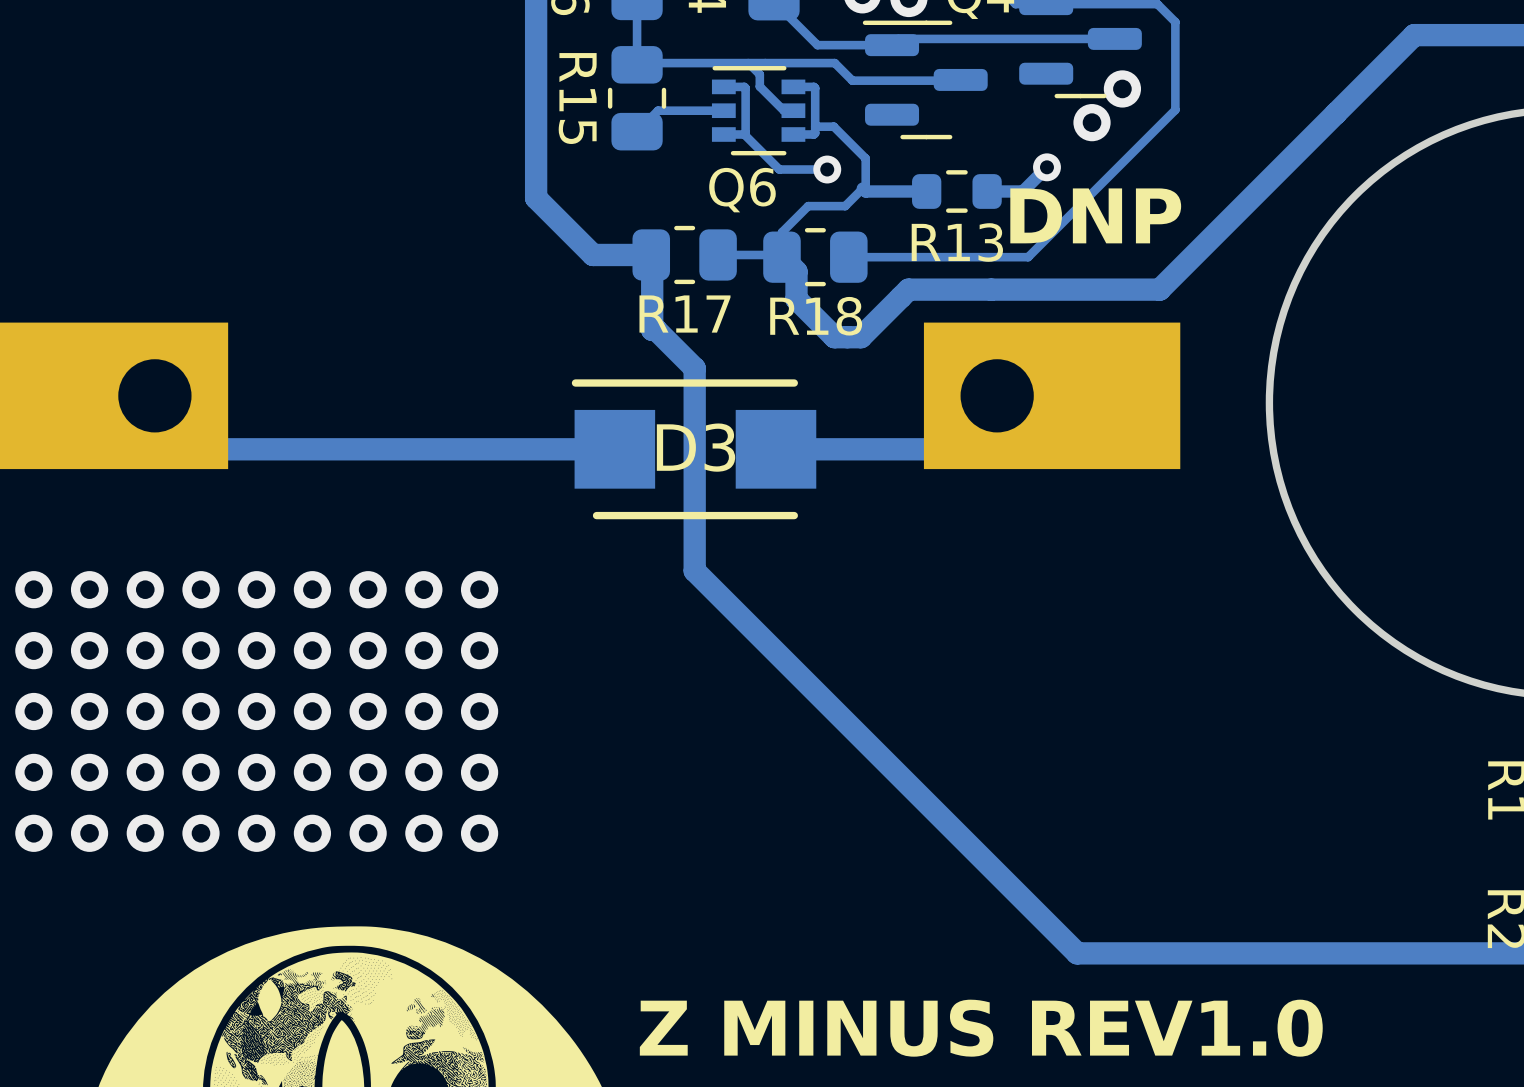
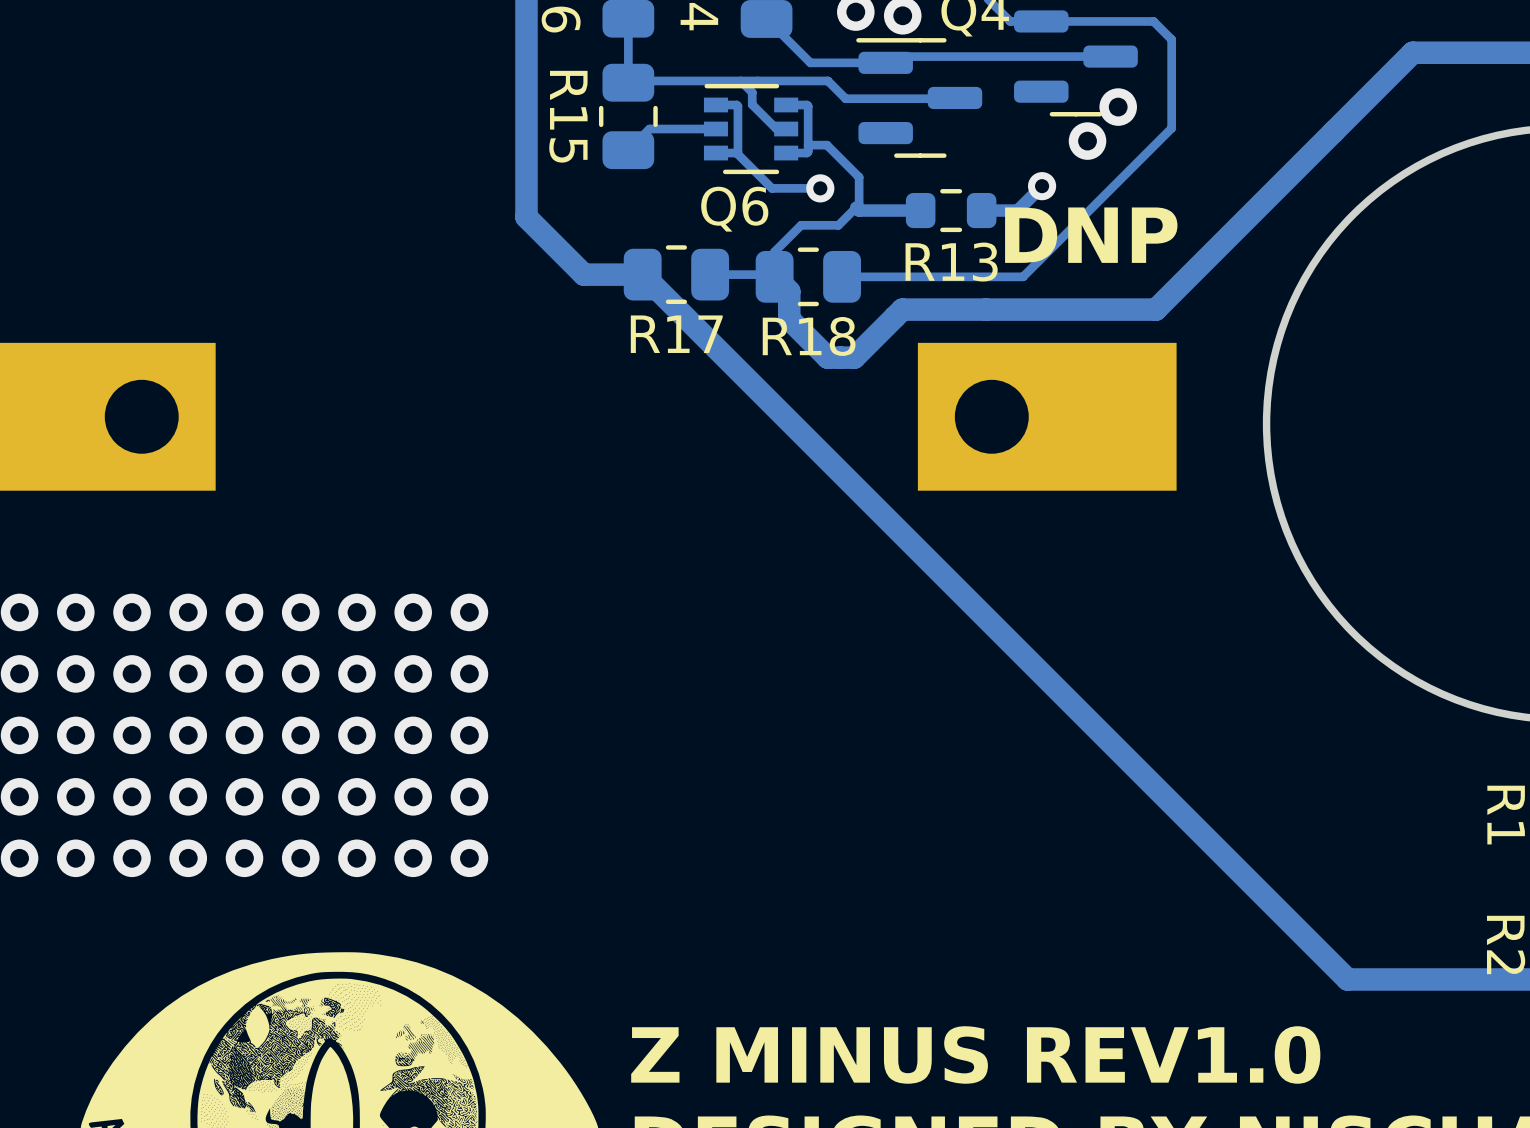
track: (652, 255) (652, 329) (656, 329) (694, 368) (694, 570) (1077, 953) (1349, 953) -> (643, 275) (1347, 979)
track: (154, 395) (208, 449) (614, 449) -> none
track: (997, 395) (943, 449) (775, 449) -> none
D3: (694, 449) -> none

